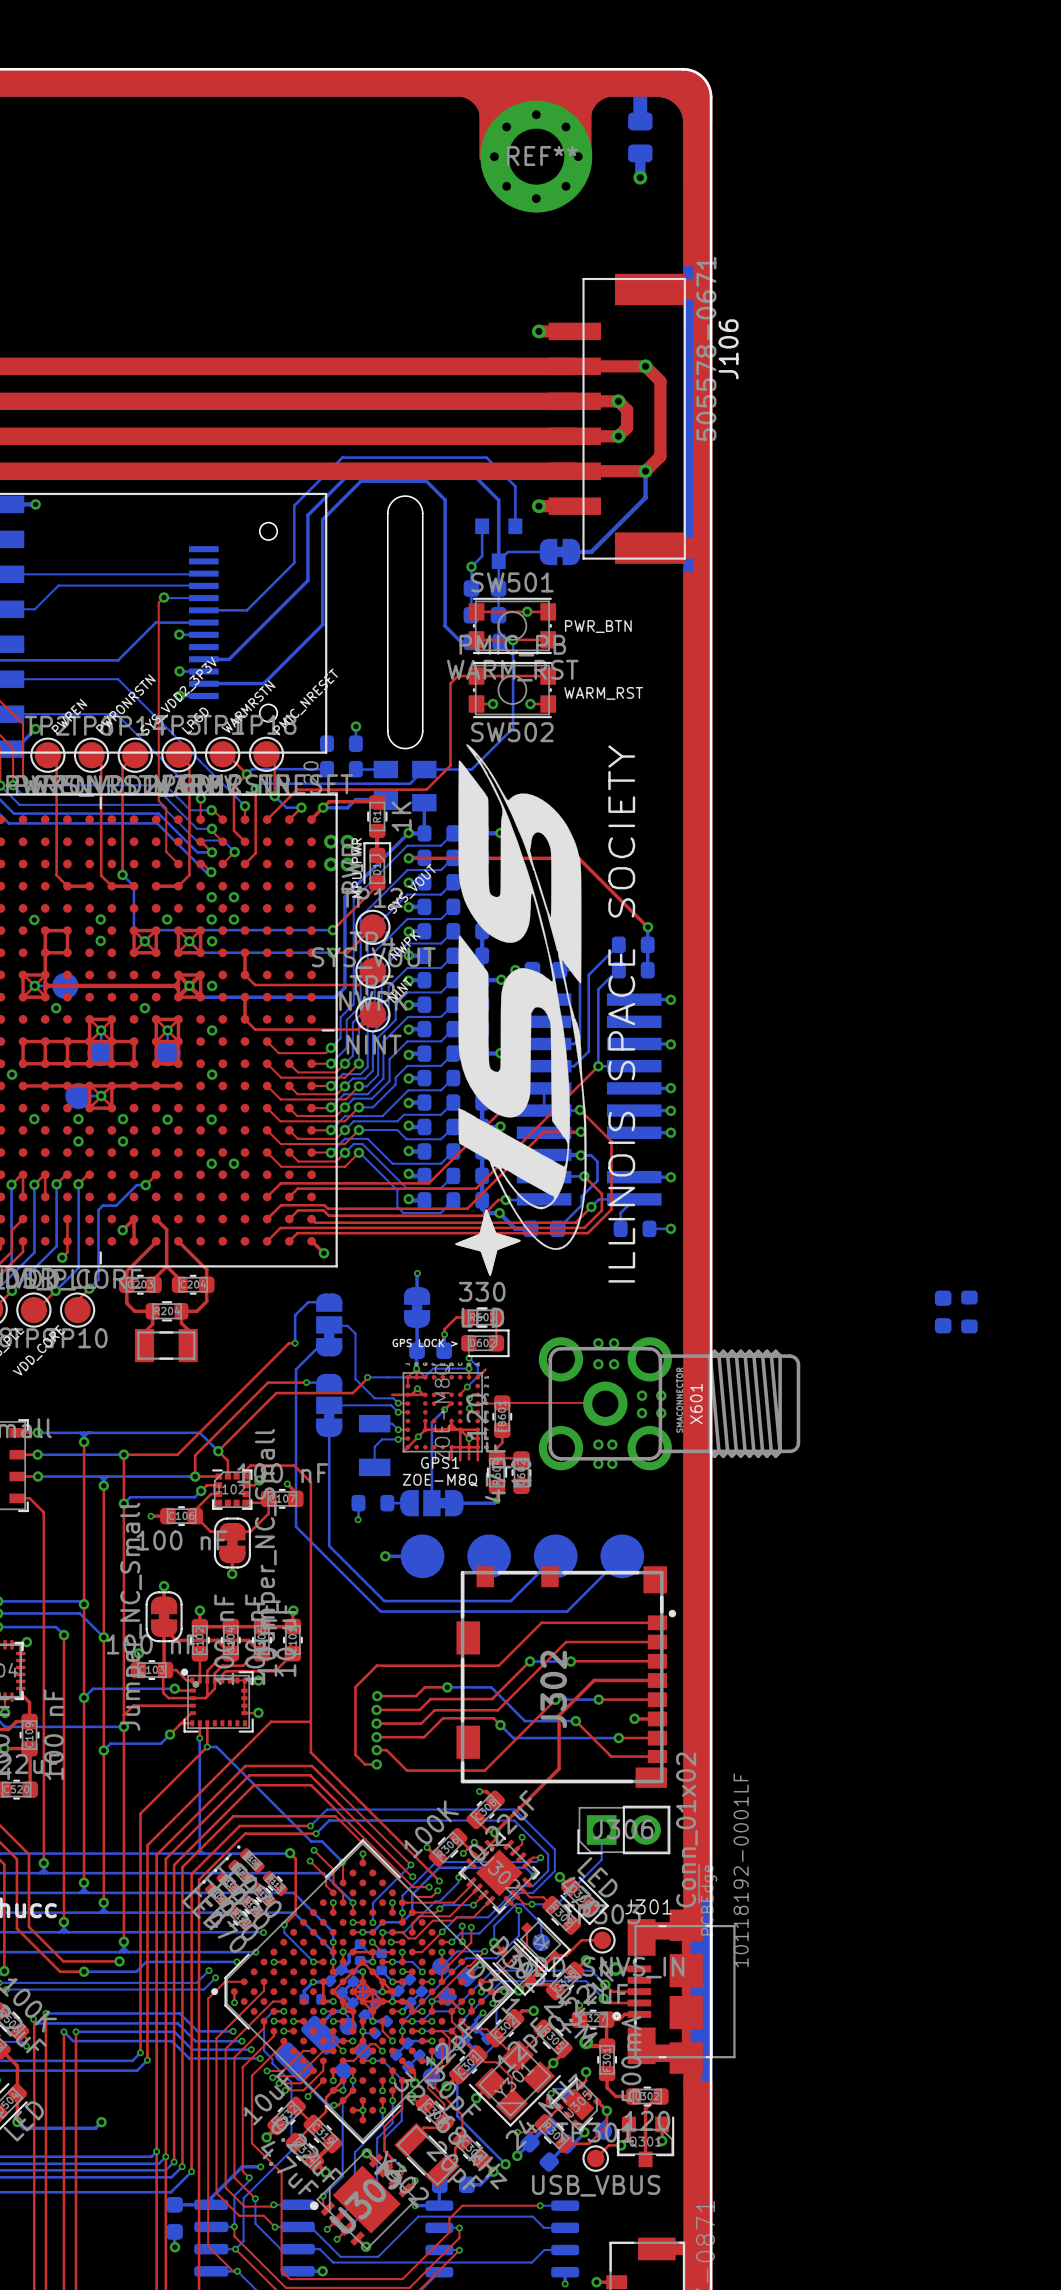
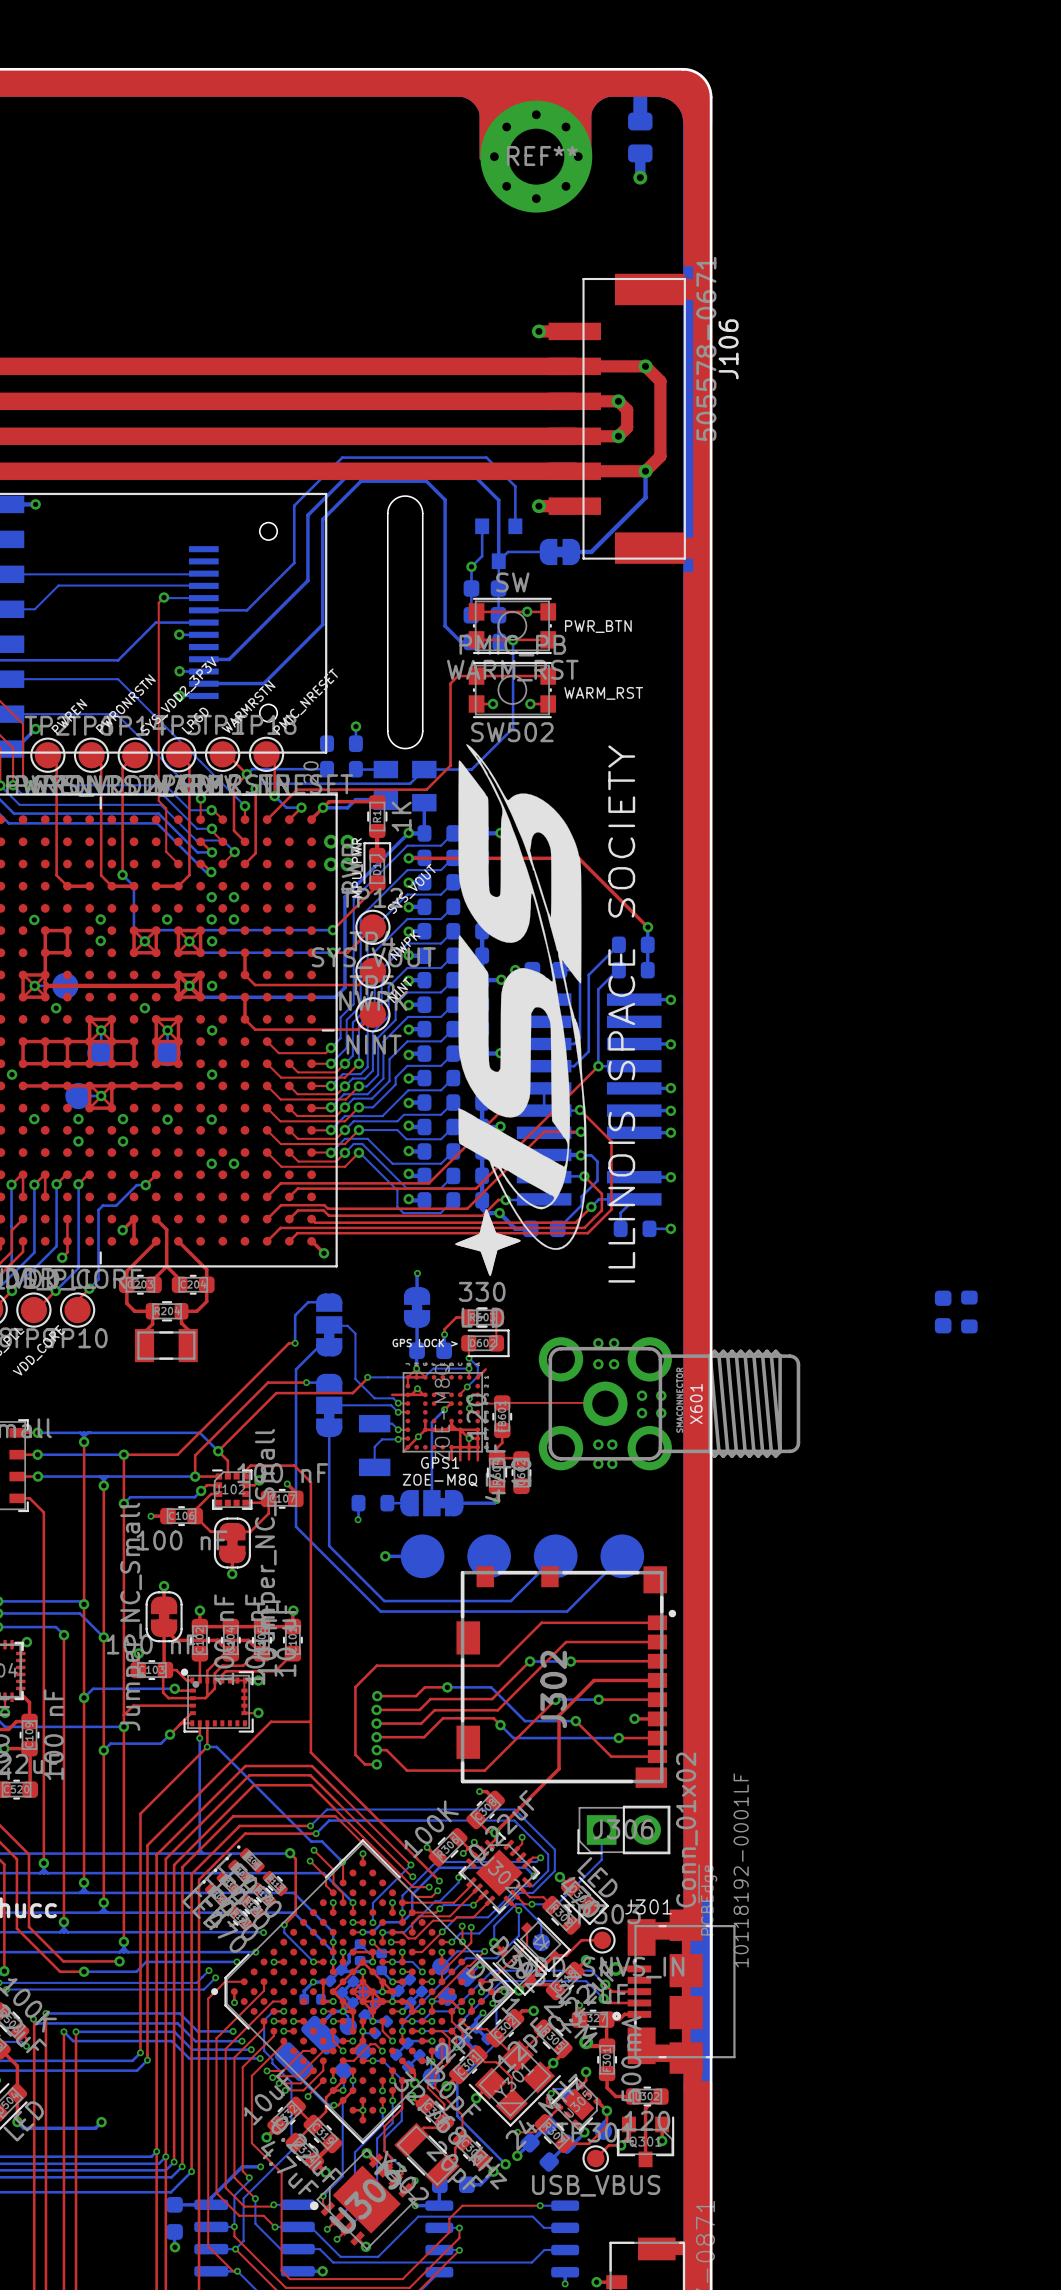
SW501 name: SW501 (512, 582) -> SW (512, 582)

